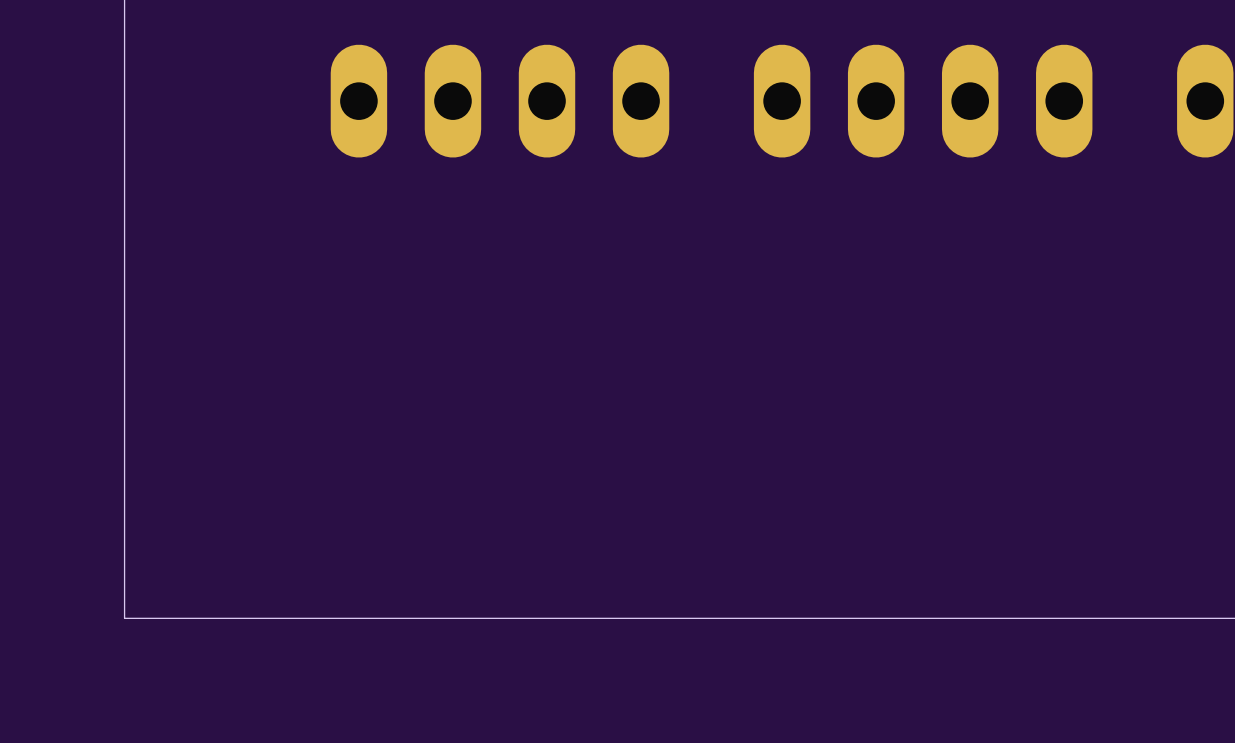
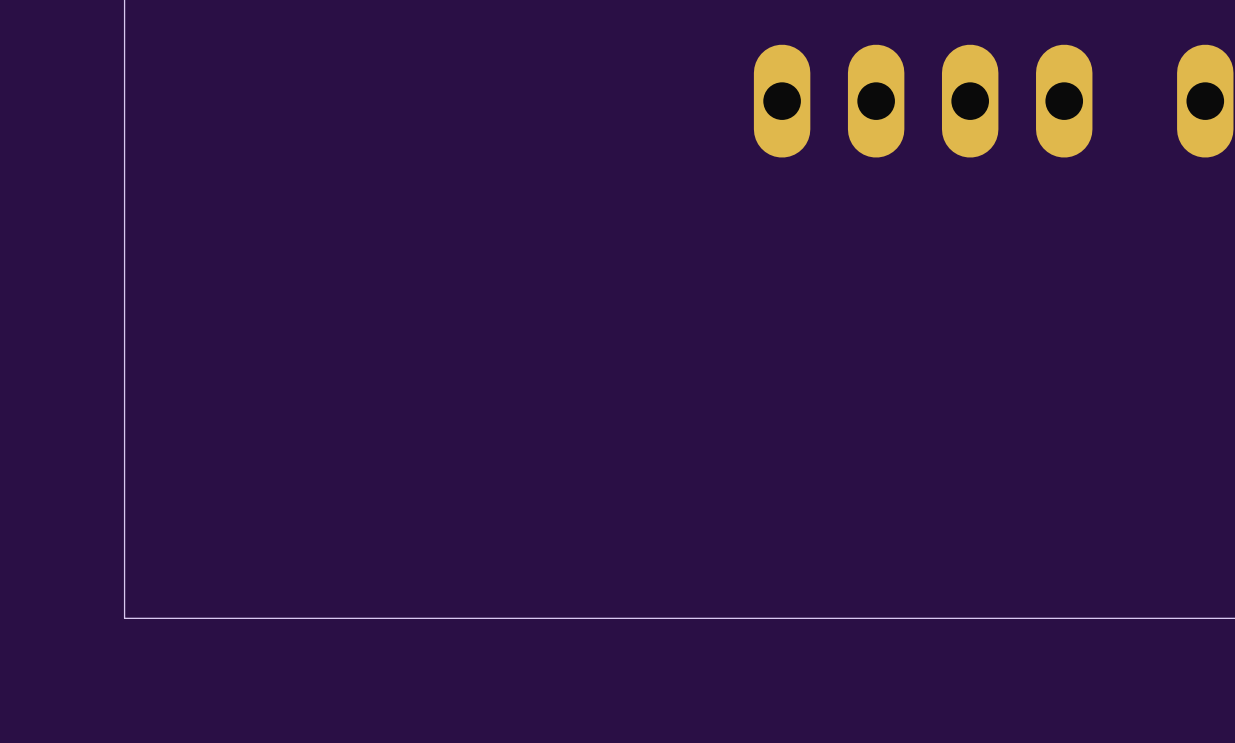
part: (499, 101) -> none

